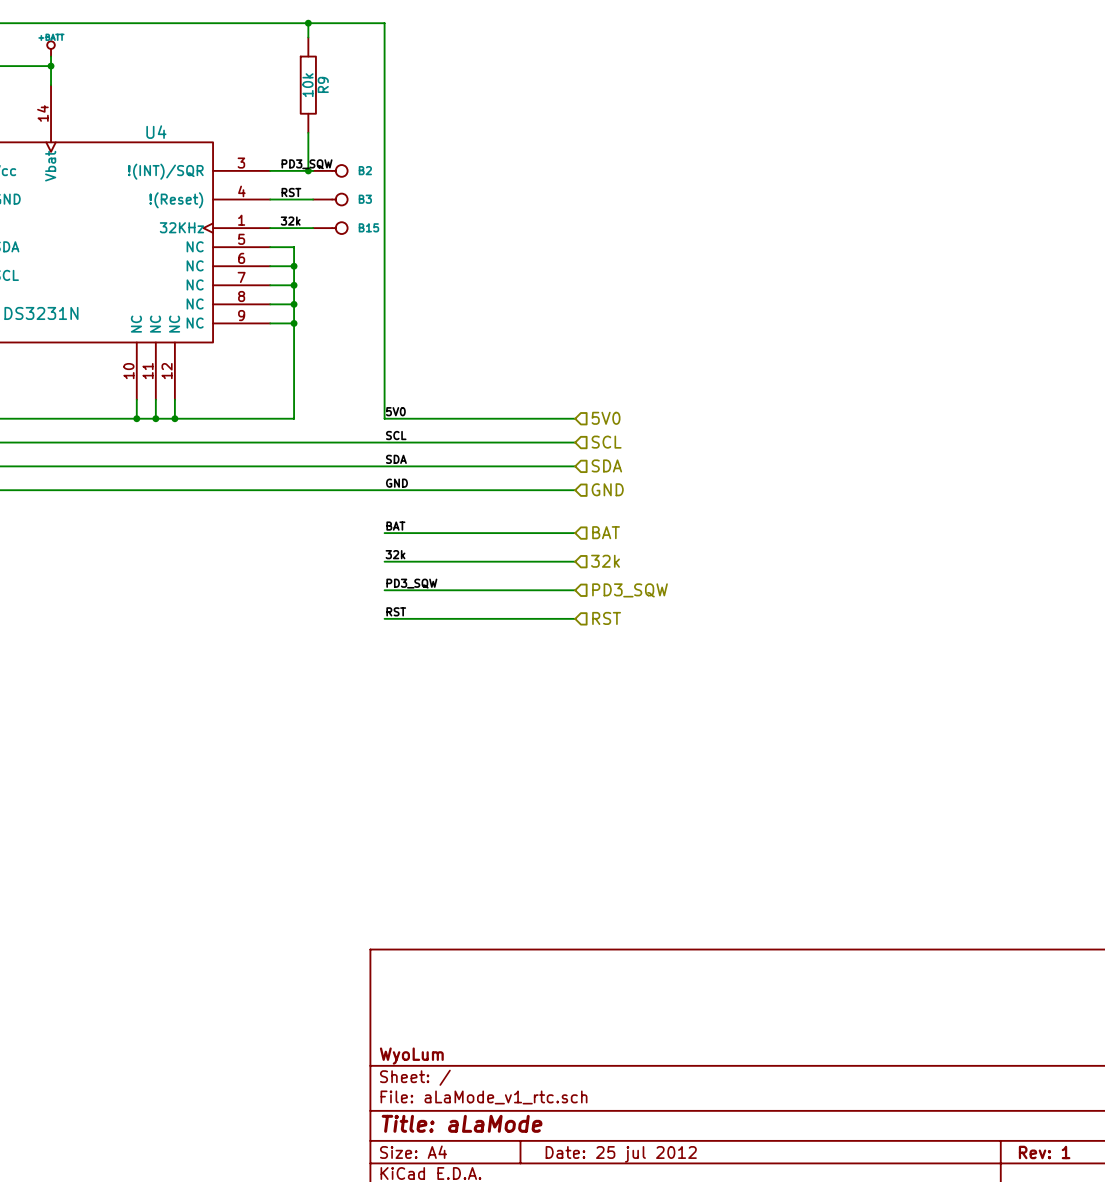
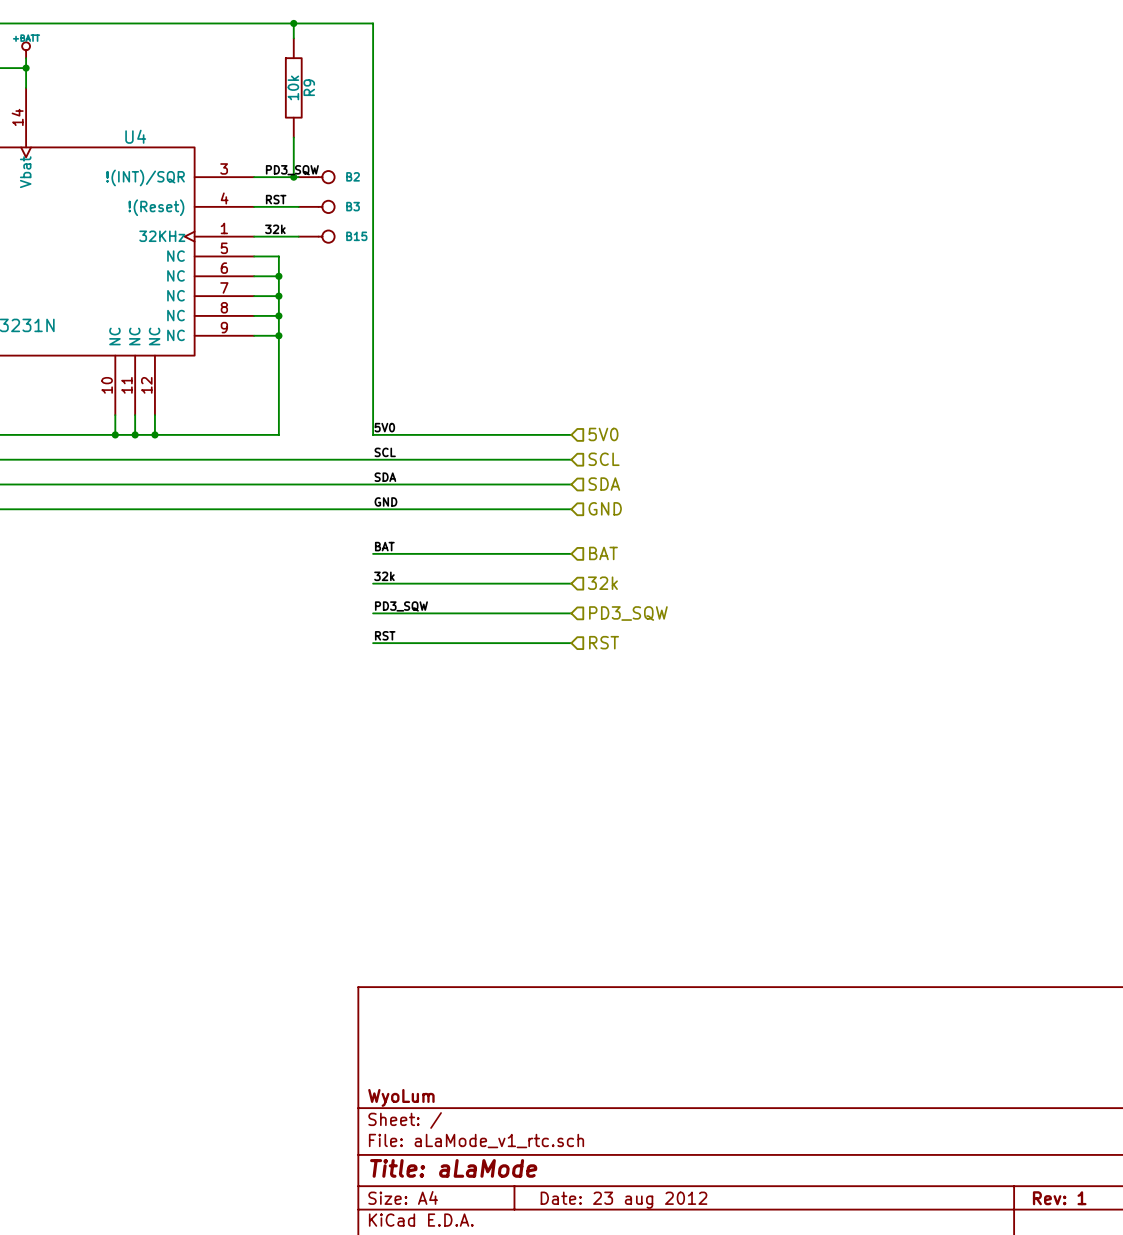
title block: Date: 25 jul 2012 (621, 1154) -> Date: 23 aug 2012 (623, 1200)

